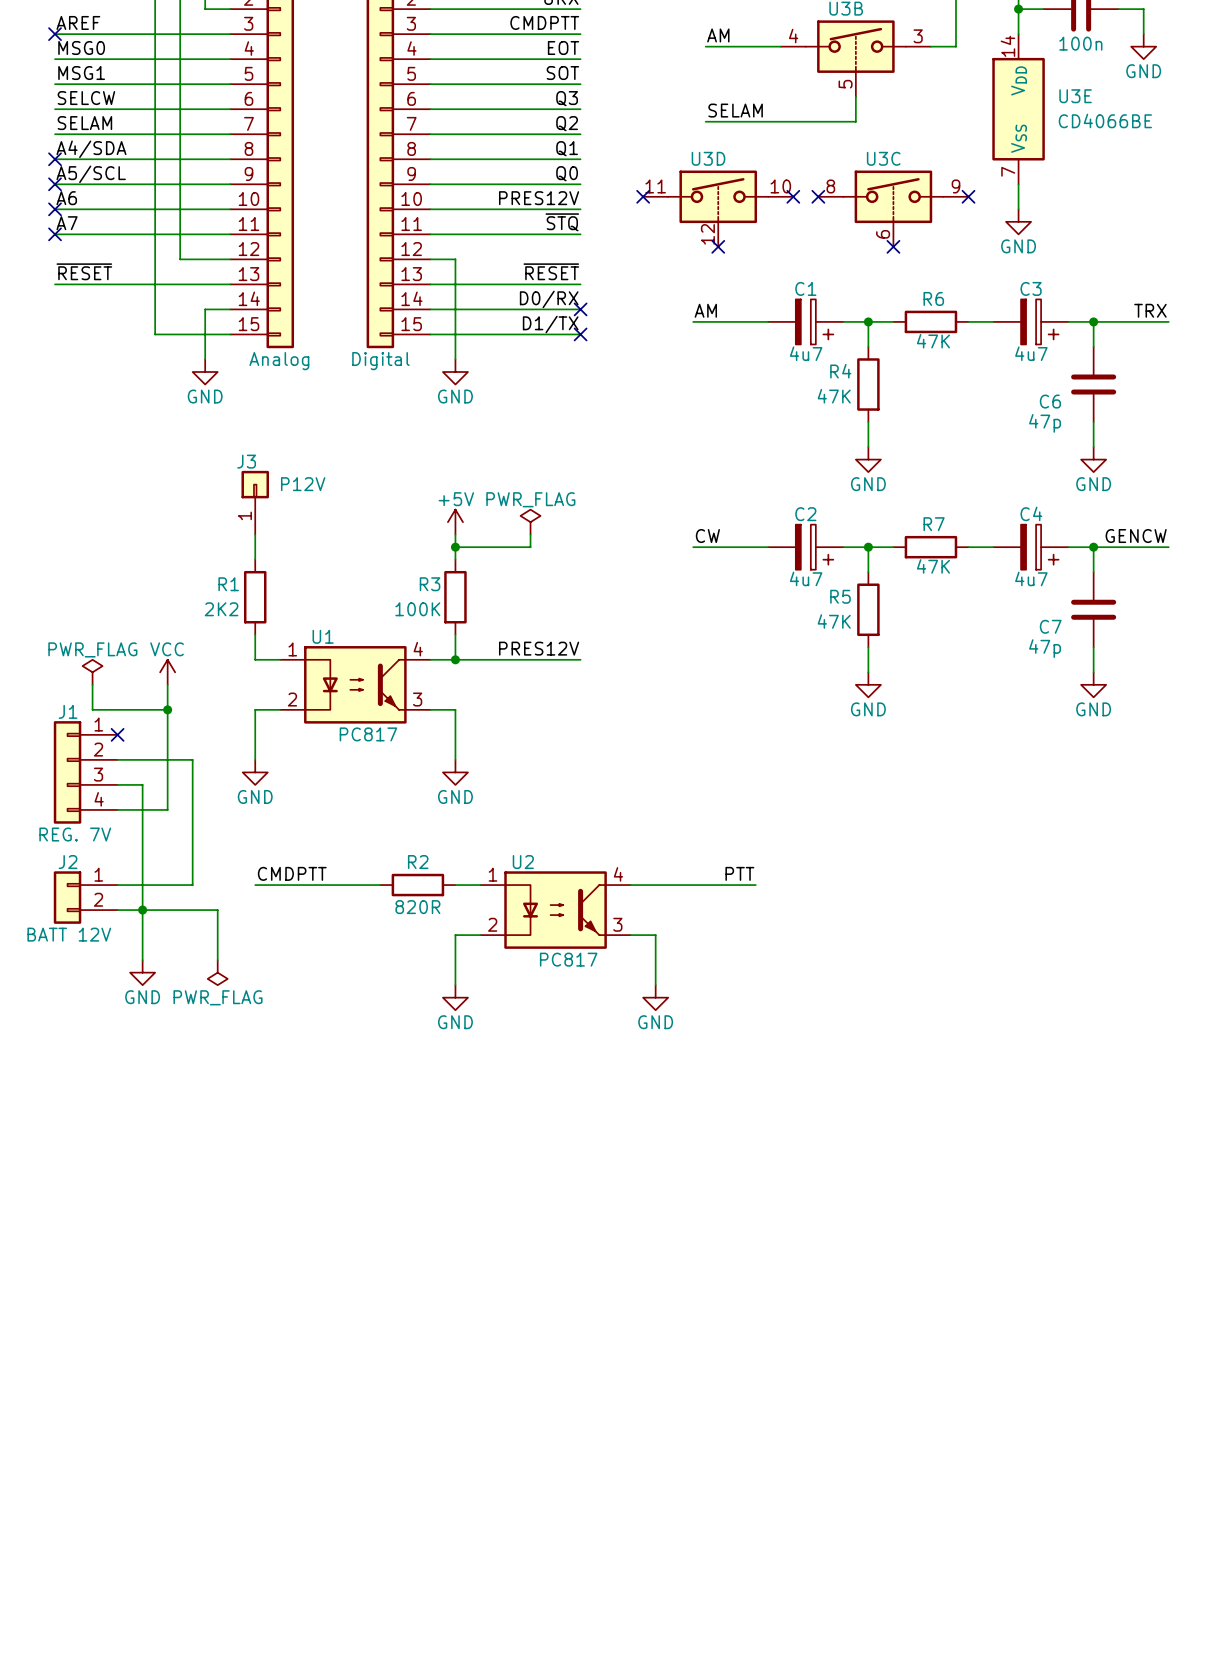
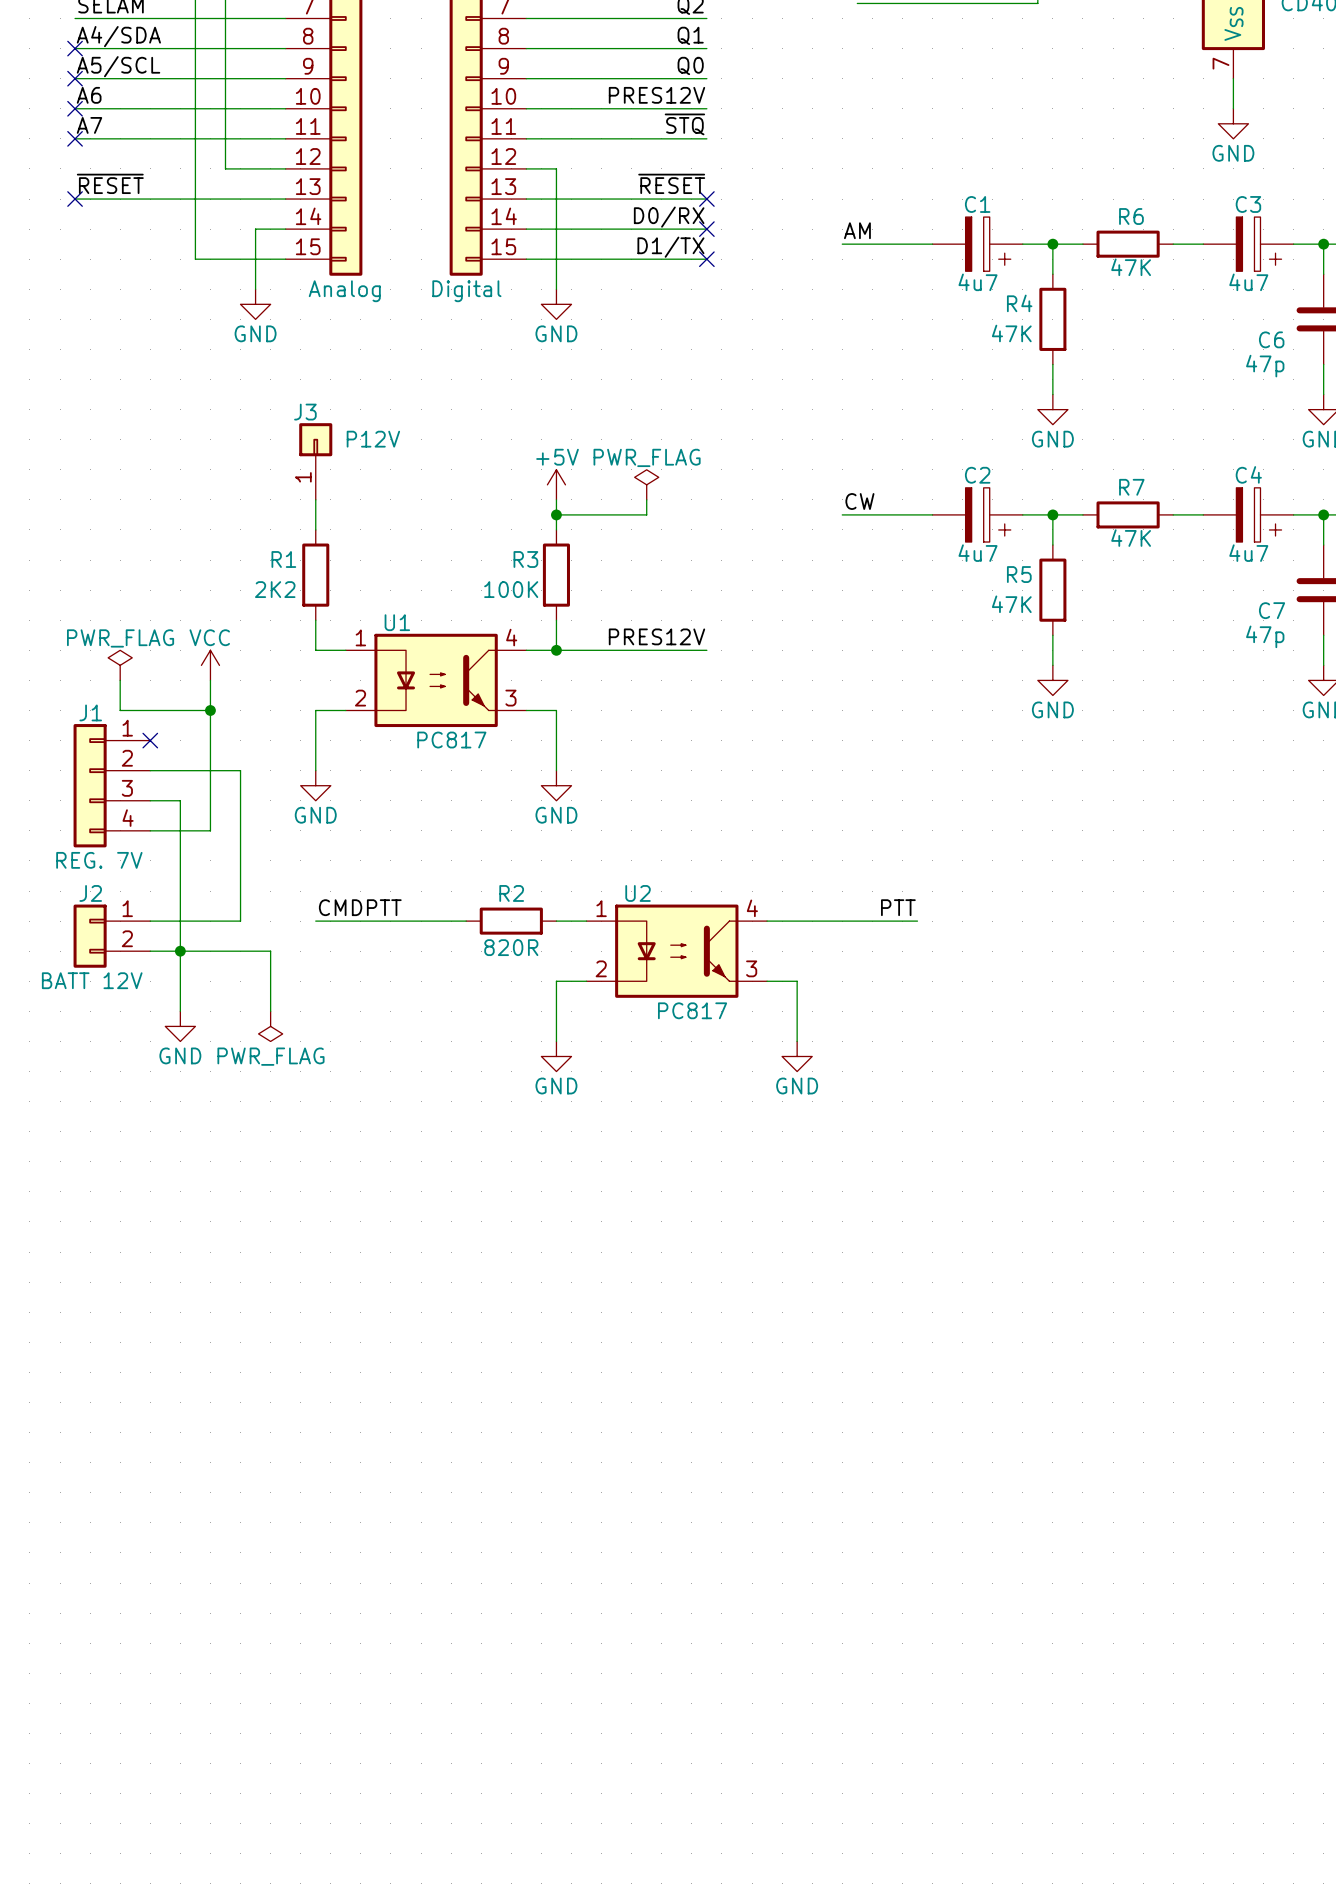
no-connect mark: (643, 196) -> none
no-connect mark: (793, 196) -> none
no-connect mark: (818, 196) -> none
no-connect mark: (968, 196) -> none
U3D: (718, 208) -> none
U3C: (893, 208) -> none
no-connect mark: (718, 246) -> none
no-connect mark: (893, 246) -> none
no-connect mark: none -> (75, 199)
no-connect mark: none -> (706, 199)

